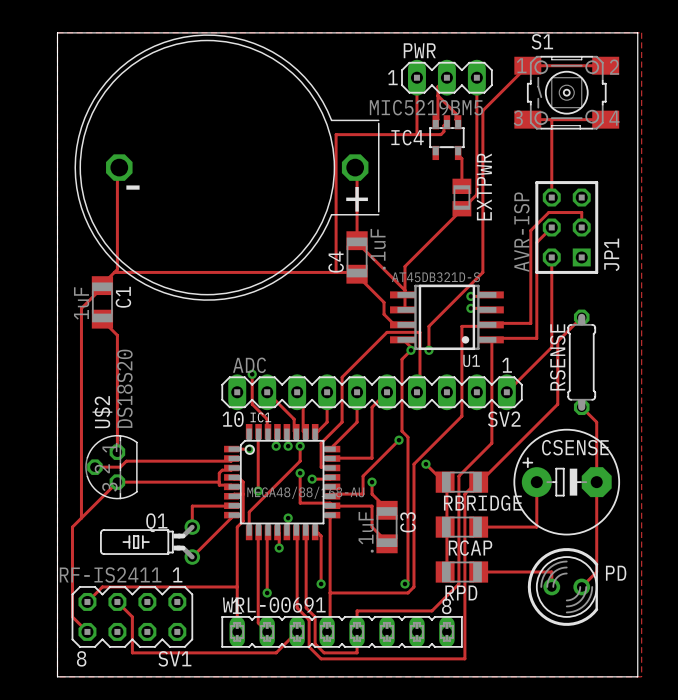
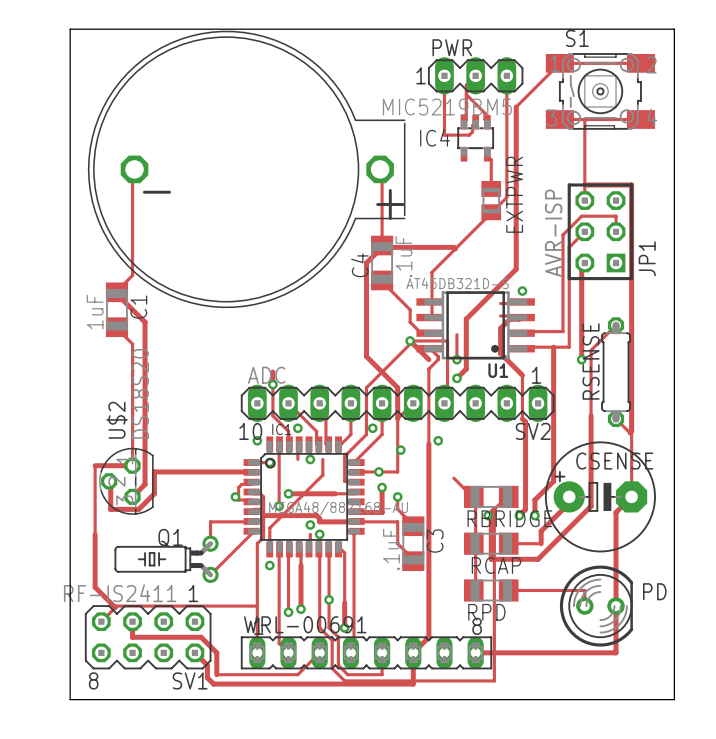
zone outline: (57, 32) (57, 676) (641, 676) (641, 32) (57, 32) -> none
track: (485, 107) (482, 110) (482, 272) (428, 326) -> (516, 107) (516, 269) (466, 319) (466, 369) (456, 378)
track: (416, 134) (336, 134) (336, 272) -> none
track: none -> (584, 185) (631, 185) (631, 431) (630, 432)
track: (357, 242) (404, 290) -> none
track: none -> (455, 248) (453, 247) (382, 247) (366, 262) (366, 356) (397, 387) (397, 418)
track: (551, 257) (551, 347) (506, 392) -> (584, 262) (581, 266) (581, 359)
track: (114, 272) (357, 272) (357, 274) -> none
via: none -> (522, 291)
track: (102, 287) (81, 308) (81, 452) -> (116, 294) (145, 322) (145, 484) (132, 496)
via: (470, 296) -> none
via: (470, 308) -> none
track: (490, 324) (461, 326) (461, 416) (413, 464) (413, 586) (407, 592) (330, 592) -> none
track: none -> (410, 340) (428, 359)
via: none -> (410, 340)
track: none -> (553, 347) (553, 481) (534, 500) (534, 515)
track: (490, 339) (491, 365) -> (521, 317) (509, 319) (500, 328) (500, 353) (522, 375)
via: (410, 350) -> none
via: none -> (581, 359)
track: none -> (272, 372) (272, 384)
via: none -> (456, 378)
track: (557, 404) (478, 482) -> (591, 415) (591, 506) (538, 559) (491, 559) (491, 515) (488, 515) (494, 509)
track: (491, 407) (491, 443) (458, 476) (458, 583) (431, 610) (357, 610) (357, 631) -> (522, 418) (525, 422) (525, 509) (519, 515)
via: none -> (297, 428)
via: none -> (372, 428)
via: none -> (257, 440)
via: none -> (438, 440)
track: (402, 431) (407, 437) (407, 580) (404, 583) -> (428, 443) (428, 637) (413, 652) (413, 684) (213, 684) (207, 677) (207, 665) (194, 652)
via: none -> (400, 450)
track: (399, 440) (363, 476) (363, 494) (333, 494) (332, 496) -> (382, 487) (382, 512) (356, 511)
via: (399, 440) -> none
via: (276, 446) -> none
via: (300, 446) -> none
track: none -> (95, 465) (132, 465)
track: (231, 458) (231, 461) (126, 461) (120, 467) (96, 467) -> (251, 472) (154, 471) (154, 493) (138, 509) (110, 509) (110, 481)
via: none -> (378, 471)
via: (425, 464) -> none
track: (300, 473) (300, 503) (330, 503) (332, 505) -> none
via: (300, 473) -> none
via: none -> (382, 487)
track: none -> (288, 493) (335, 493)
via: none -> (288, 493)
via: (312, 479) -> none
track: (216, 482) (117, 482) (72, 527) (72, 616) (87, 631) -> none
via: none -> (235, 496)
track: (596, 482) (596, 572) (581, 586) -> (631, 496) (616, 512) (616, 652) (475, 652)
track: (536, 488) (536, 527) (509, 527) -> (569, 503) (541, 531) (541, 543)
track: none -> (263, 515) (316, 515) (319, 521) (357, 521)
via: none -> (488, 515)
via: none -> (519, 515)
via: none -> (534, 515)
via: none -> (310, 524)
track: none -> (95, 534) (95, 587) (115, 607)
via: (288, 518) -> none
via: none -> (319, 534)
via: none -> (269, 565)
track: none -> (301, 565) (301, 609)
via: (279, 548) -> none
via: none -> (329, 599)
track: none -> (344, 602) (344, 627)
via: (321, 583) -> none
via: (404, 583) -> none
via: none -> (301, 609)
track: (117, 601) (132, 616) (132, 652) (198, 652) -> (132, 621) (132, 637) (201, 637) (216, 652) (216, 674)
via: none -> (344, 627)

